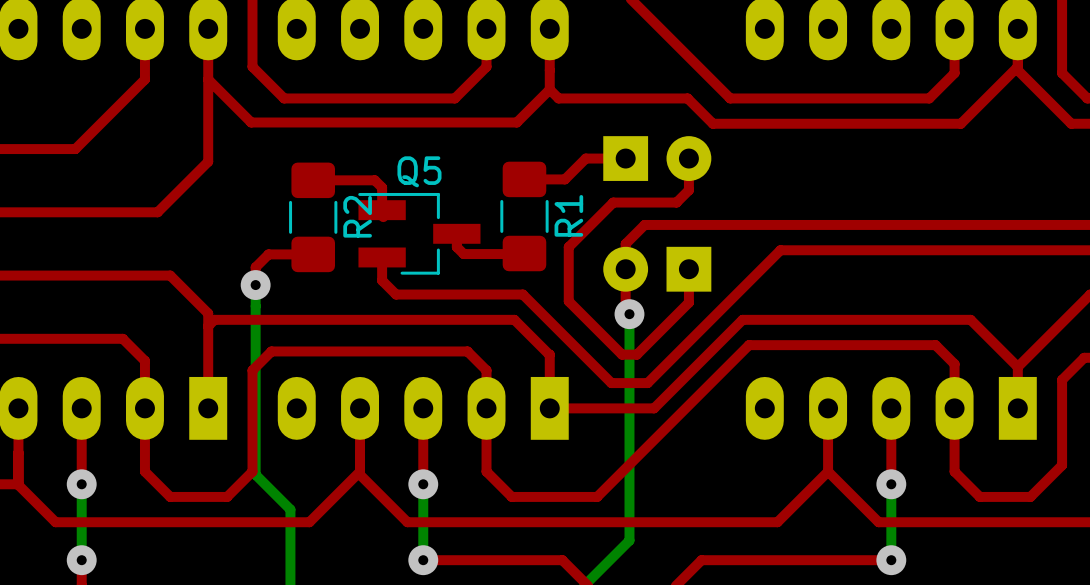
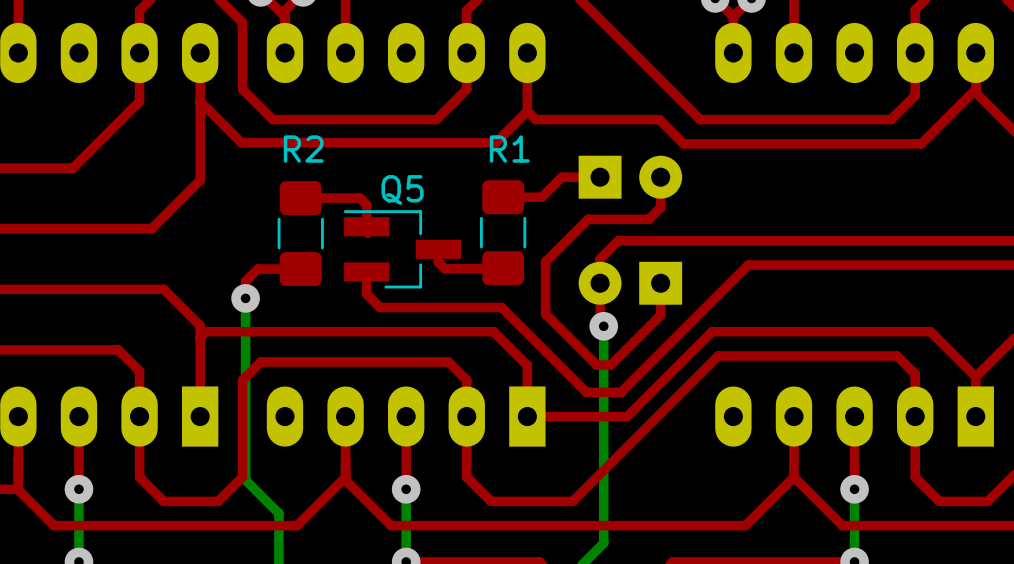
R1 name rotation: 0° (568, 215) -> 90° clockwise (509, 149)
R1 name position: R1 (568, 215) -> R1 (509, 149)
R2 name rotation: 0° (357, 216) -> 90° clockwise (303, 149)
R2 name position: R2 (357, 216) -> R2 (303, 149)

